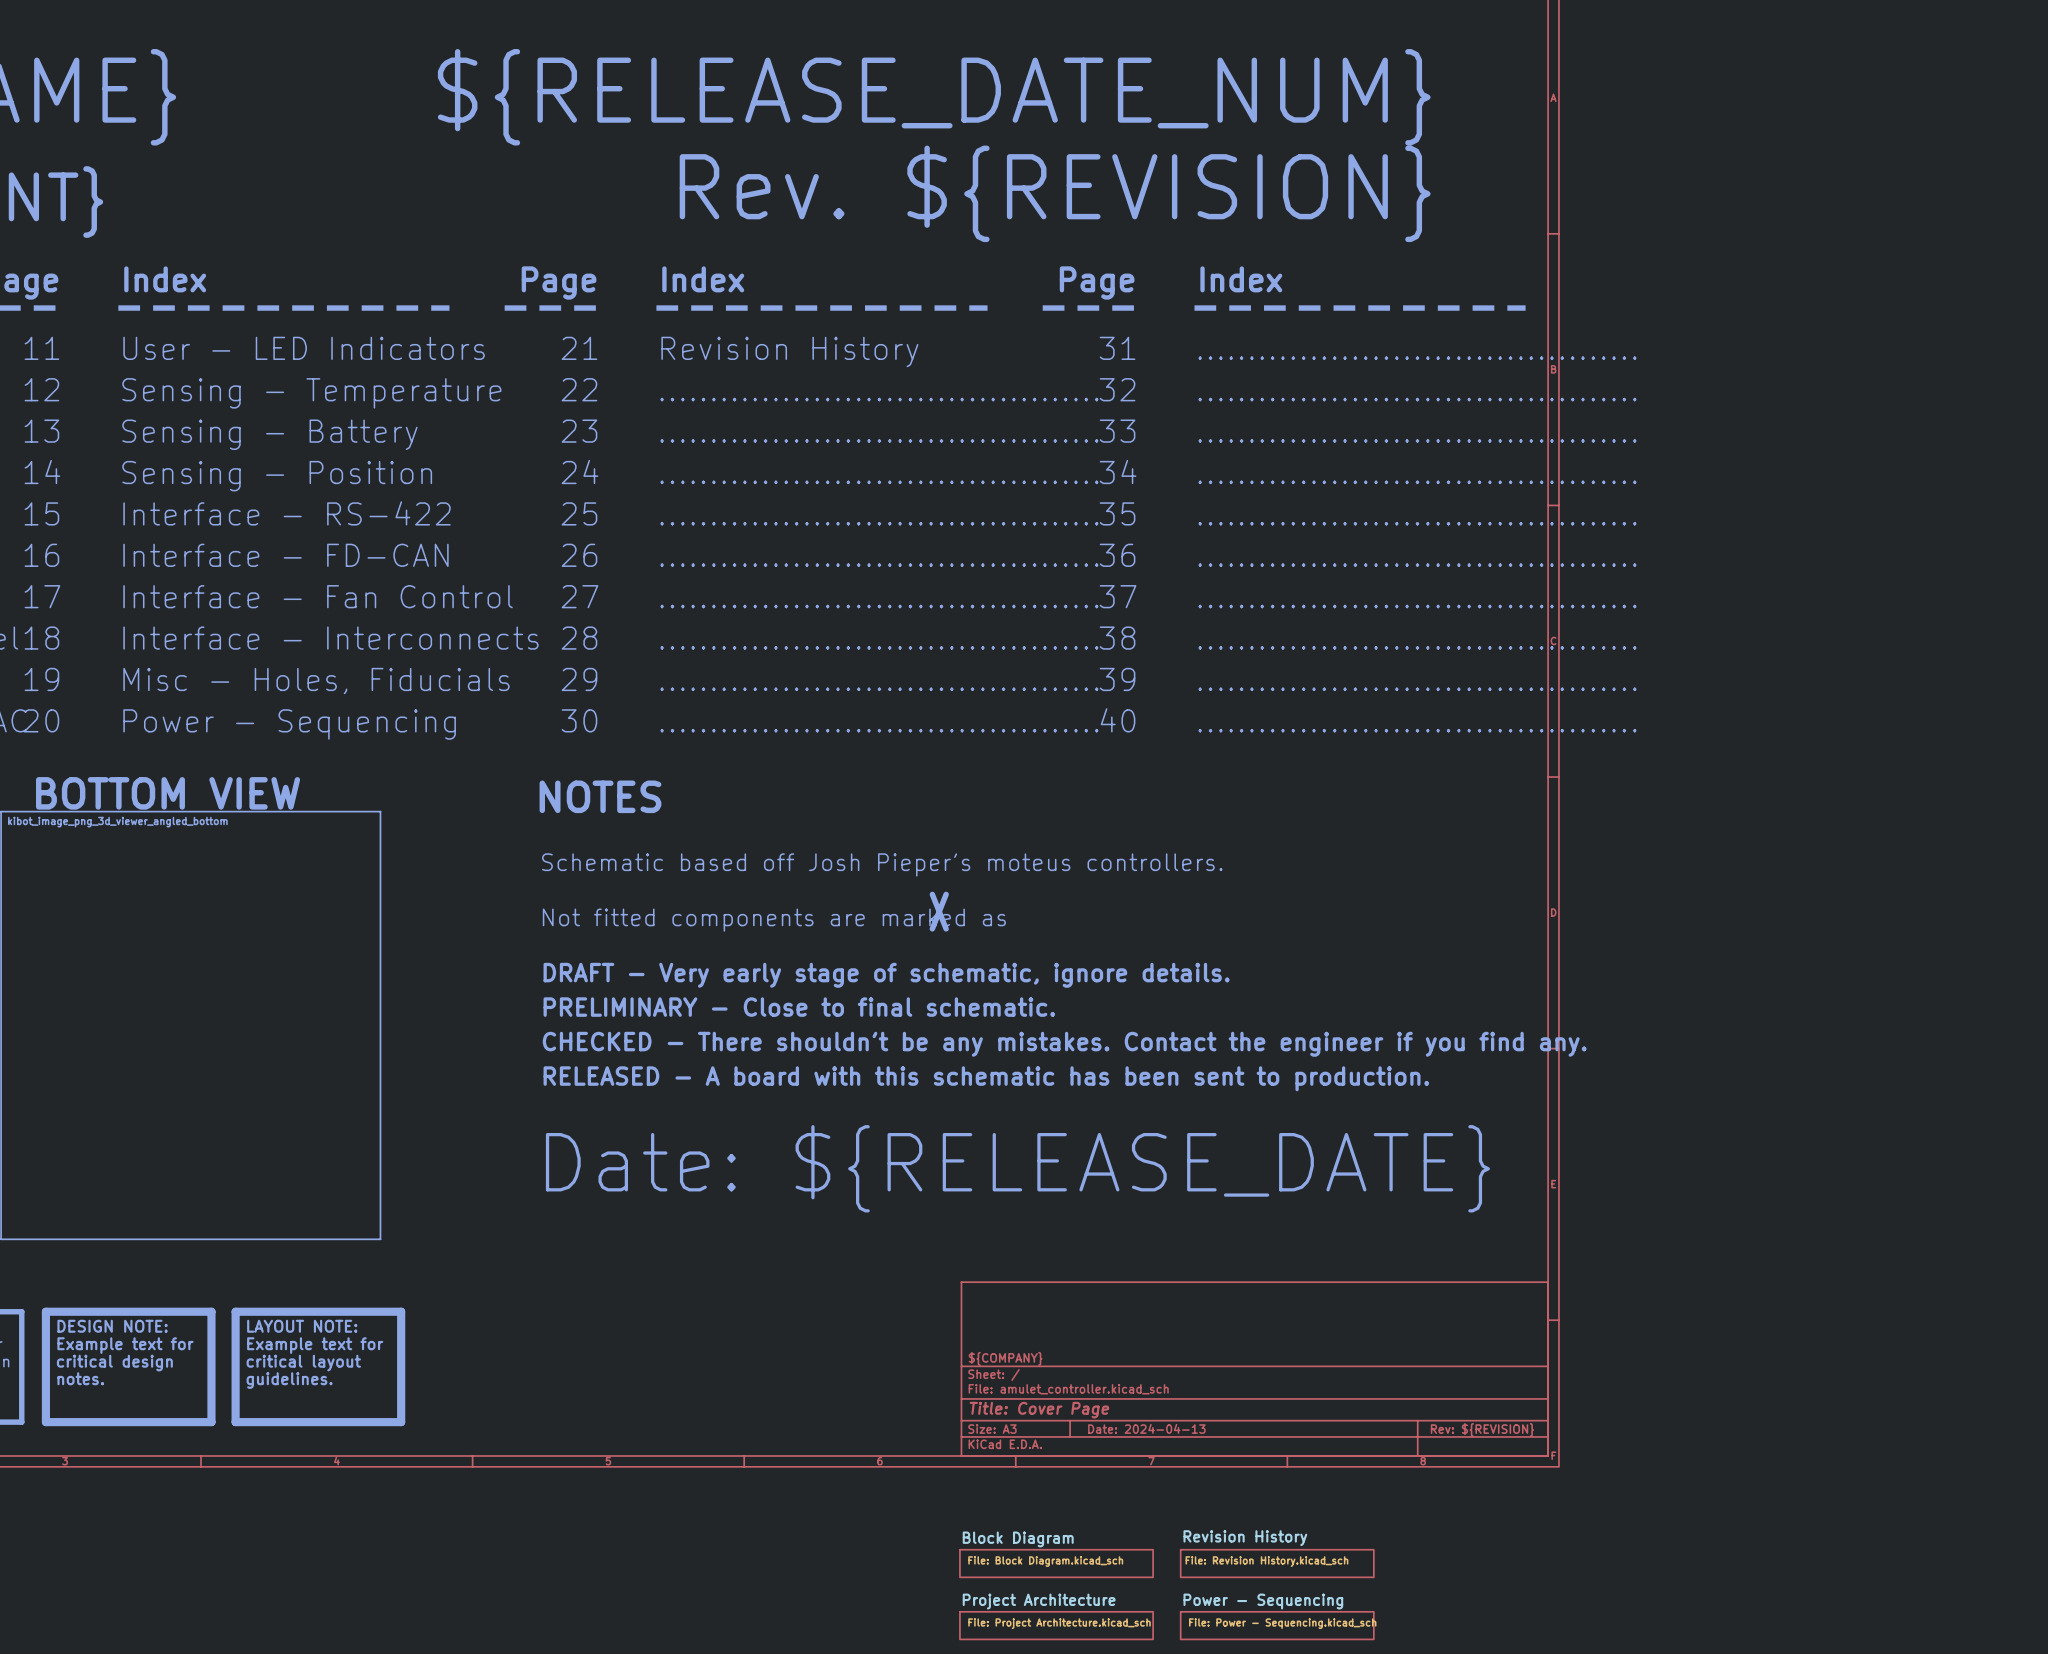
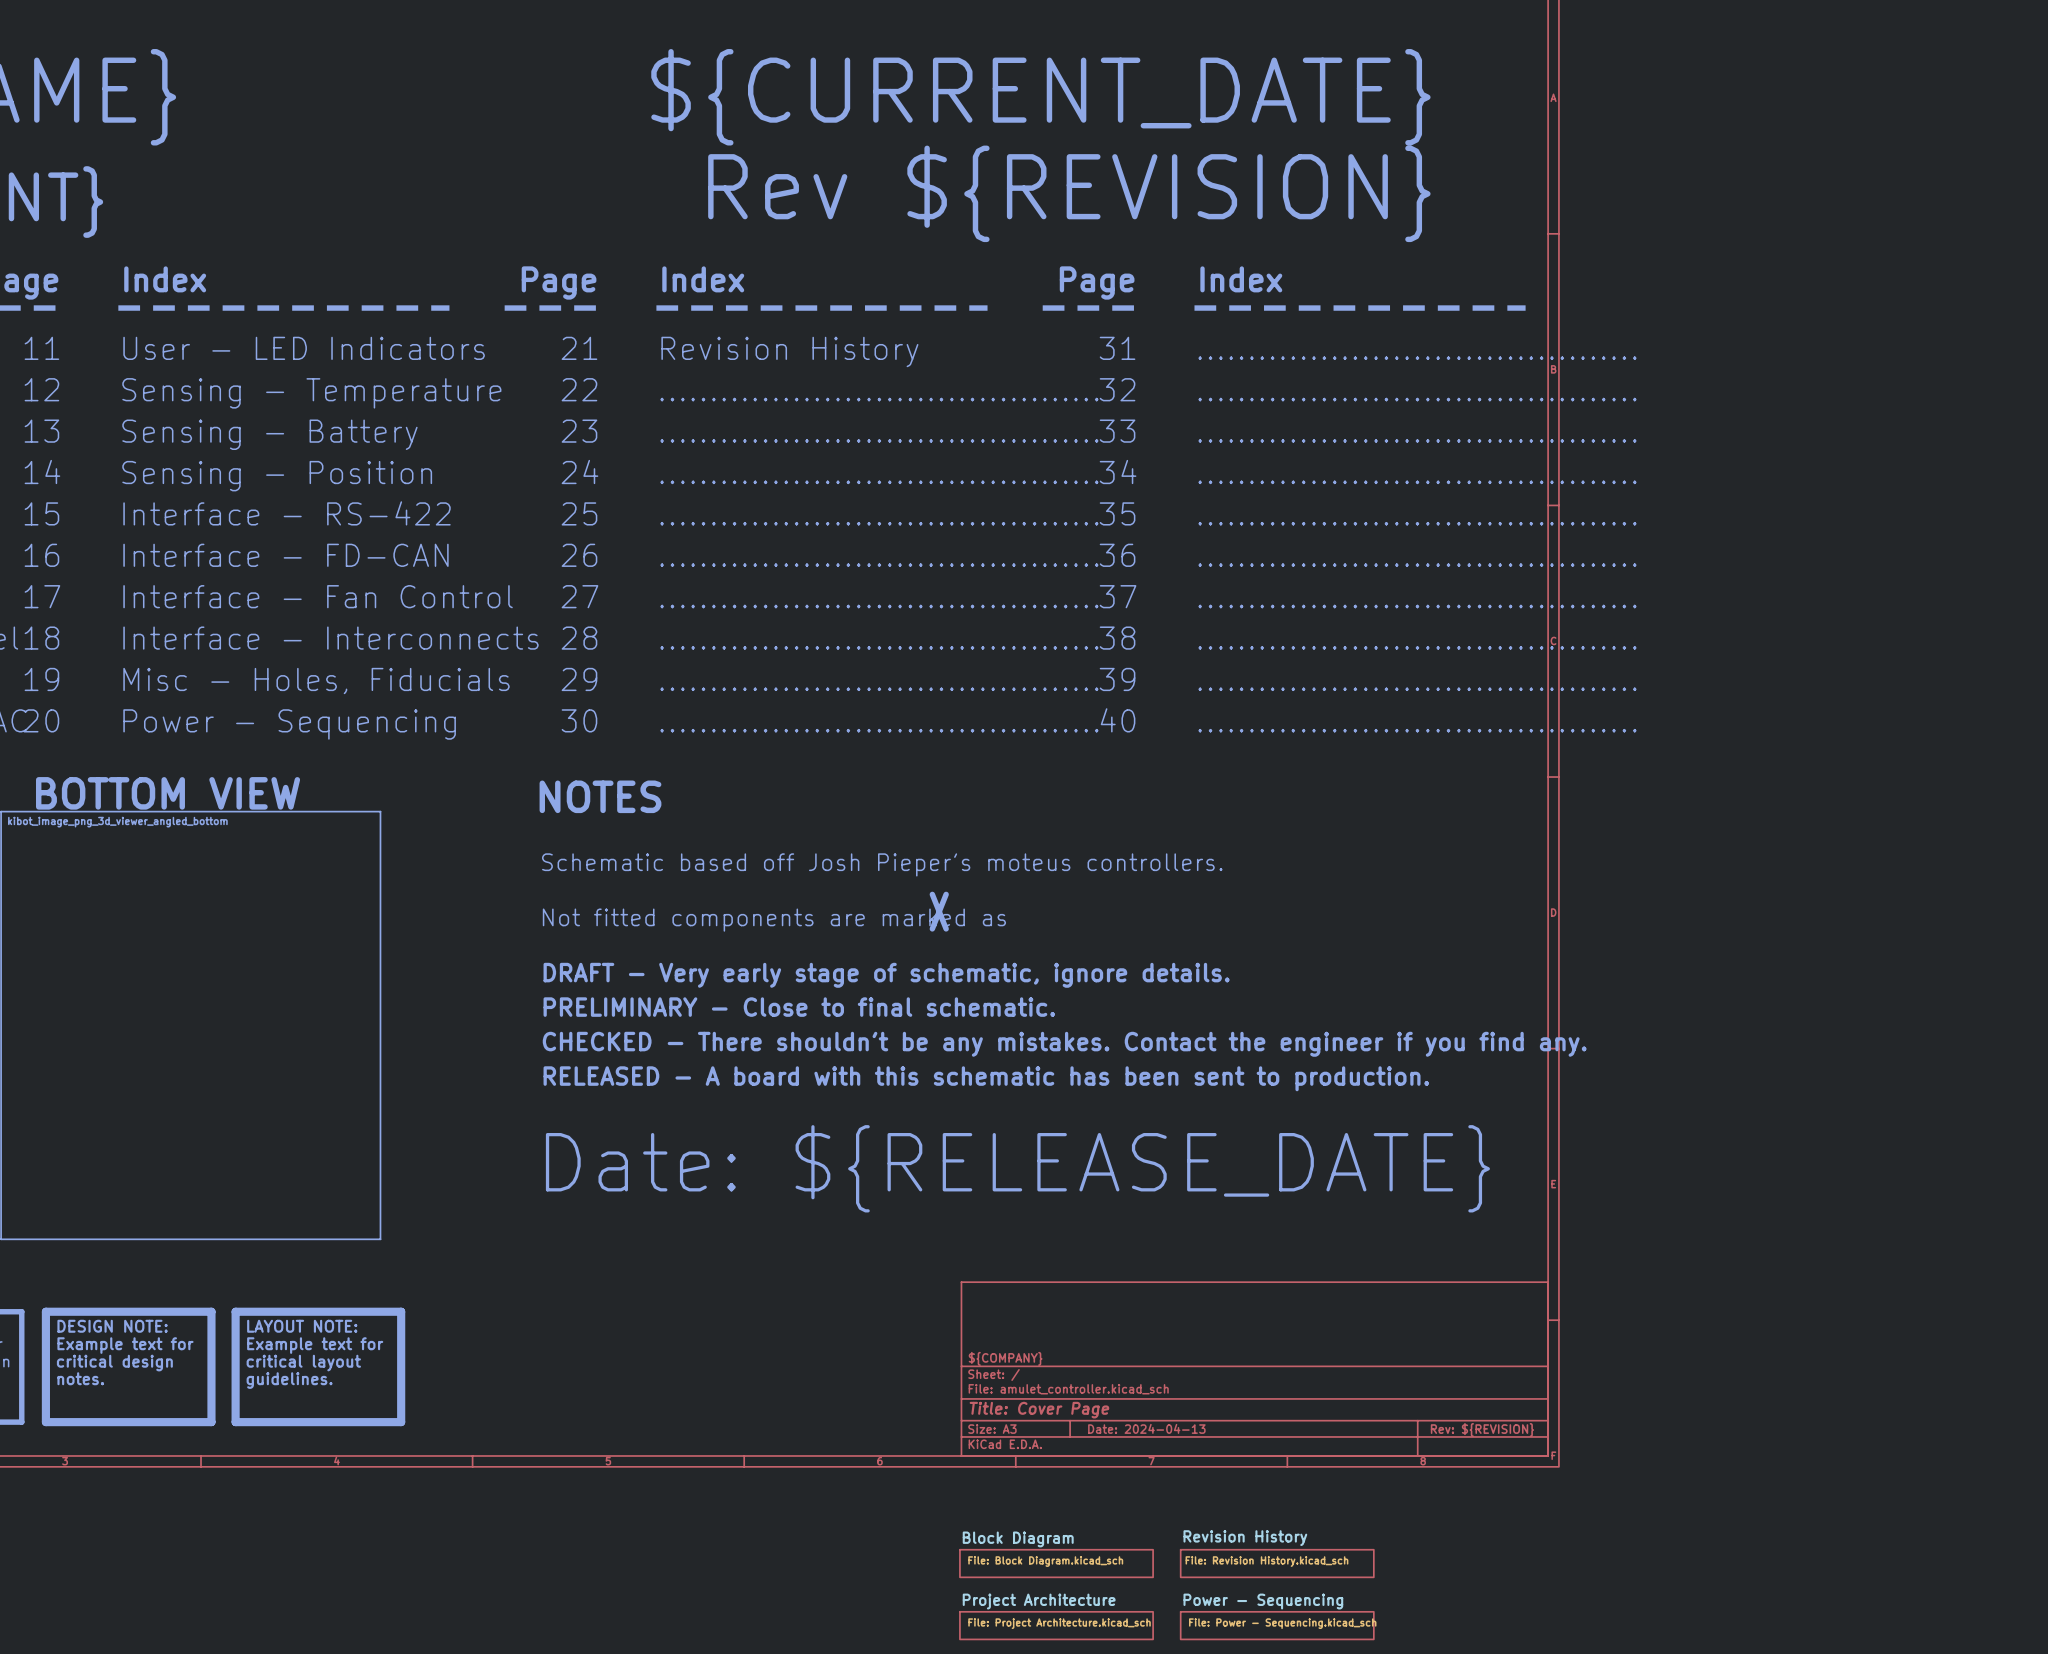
text: ${RELEASE_DATE_NUM} (934, 97) -> ${CURRENT_DATE} (1040, 97)
text: Rev. ${REVISION} (1055, 193) -> Rev ${REVISION} (1069, 193)

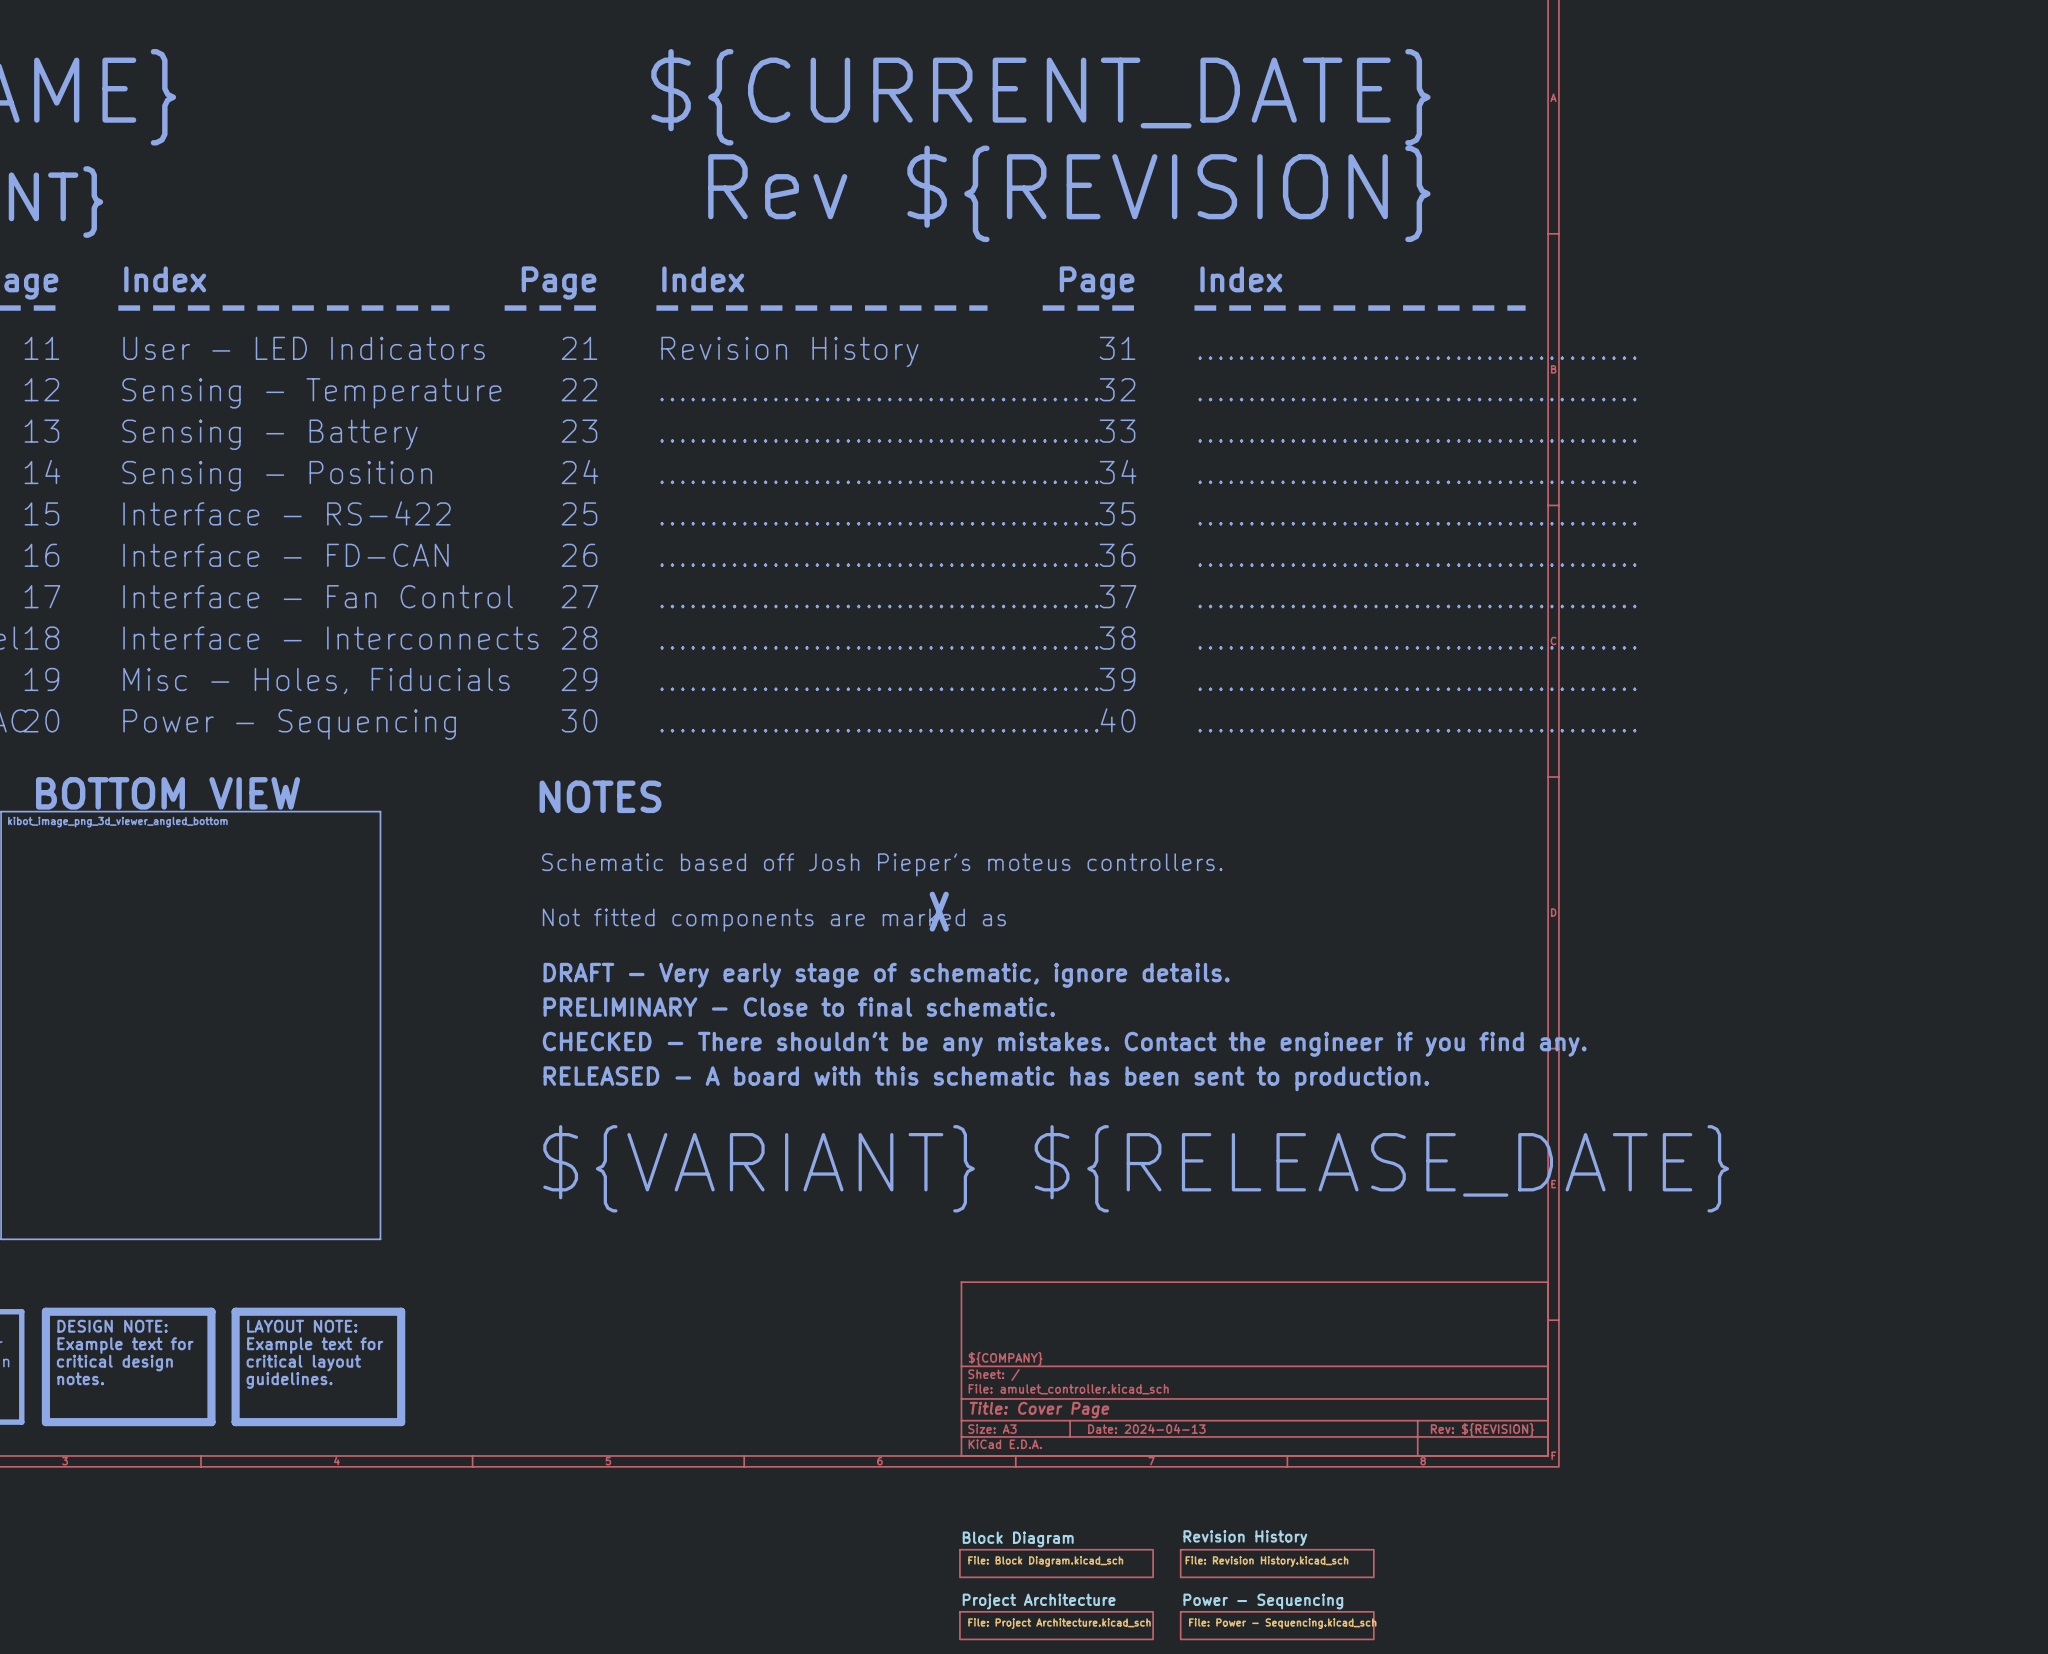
text: Date: ${RELEASE_DATE} (1017, 1168) -> ${VARIANT} ${RELEASE_DATE} (1136, 1168)

